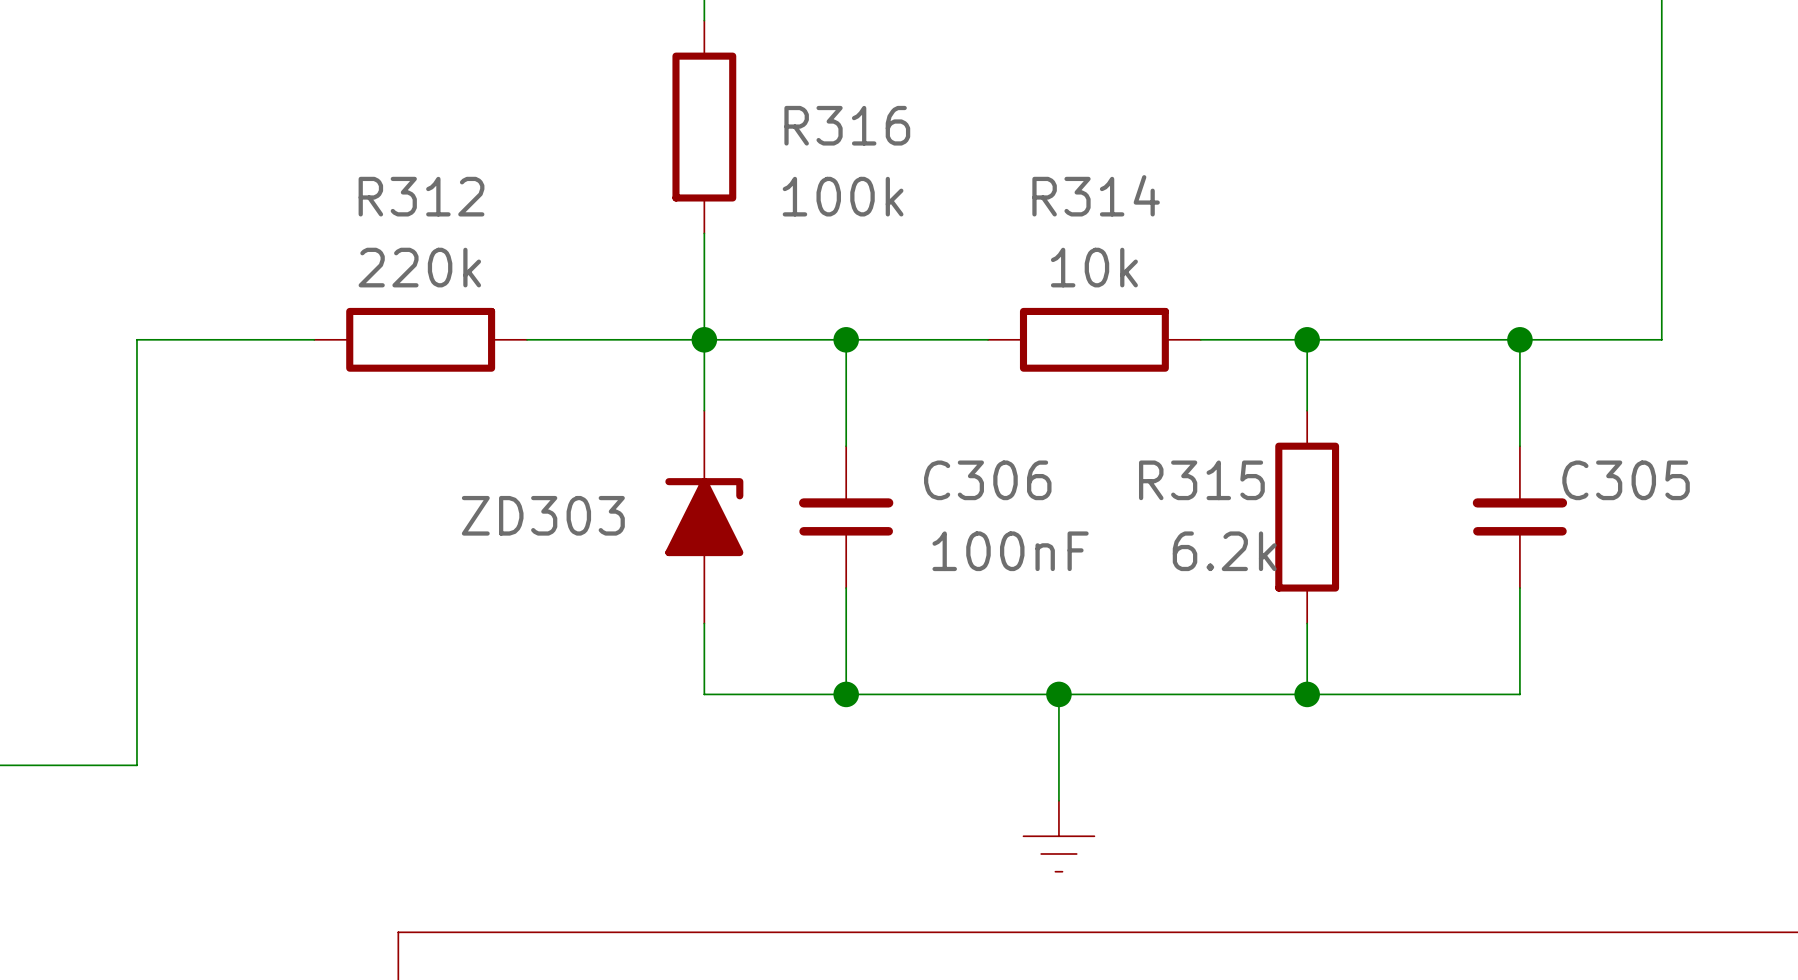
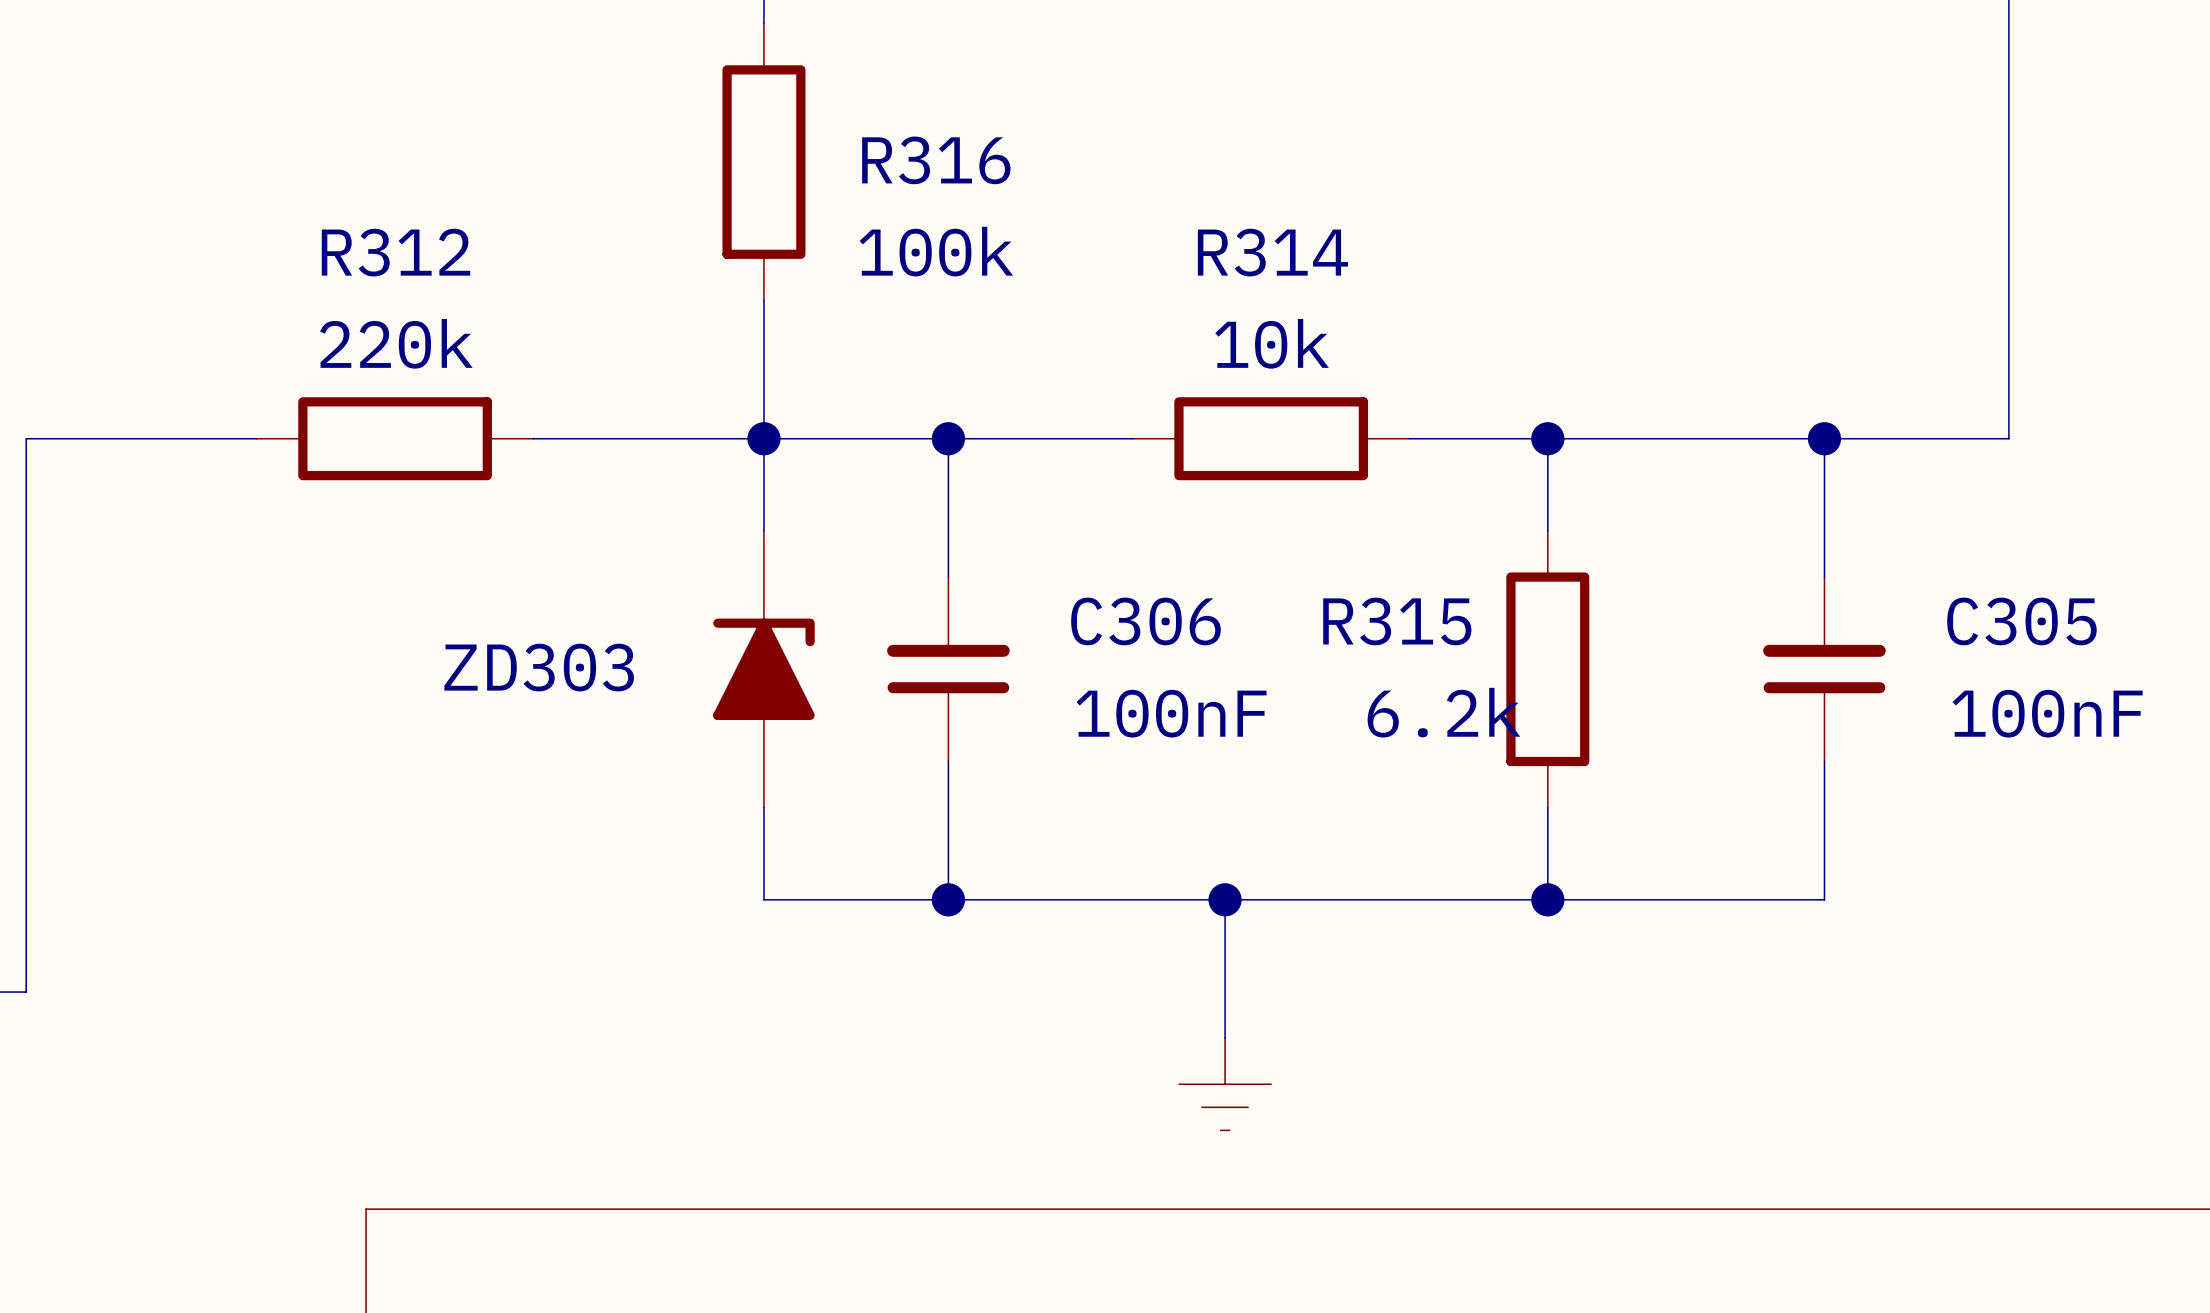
C305 name position: C305 (1626, 480) -> C305 (2021, 621)
C305 value: none -> 100nF (2047, 713)

